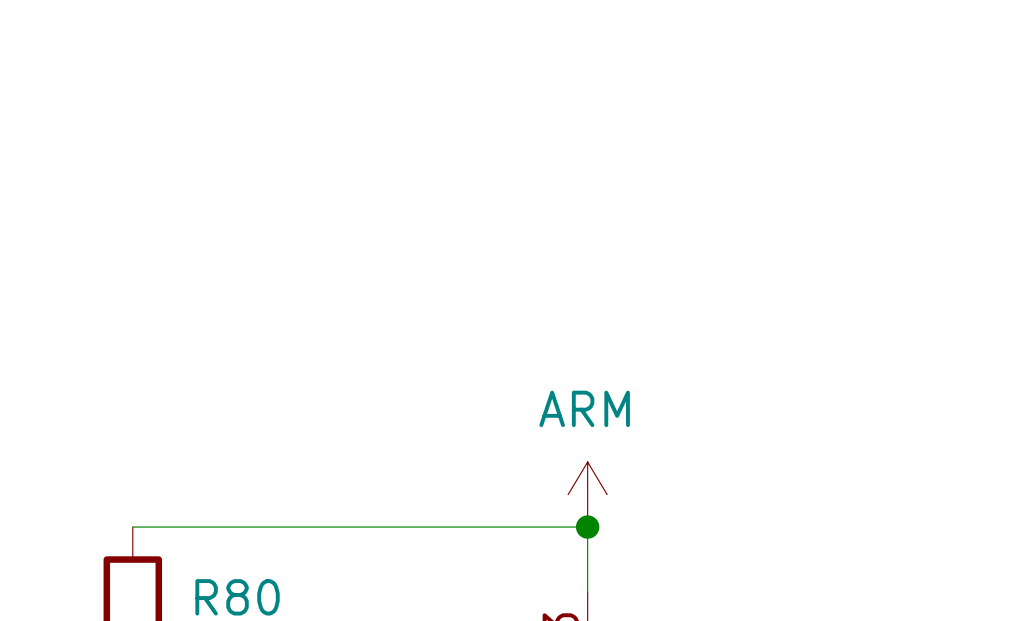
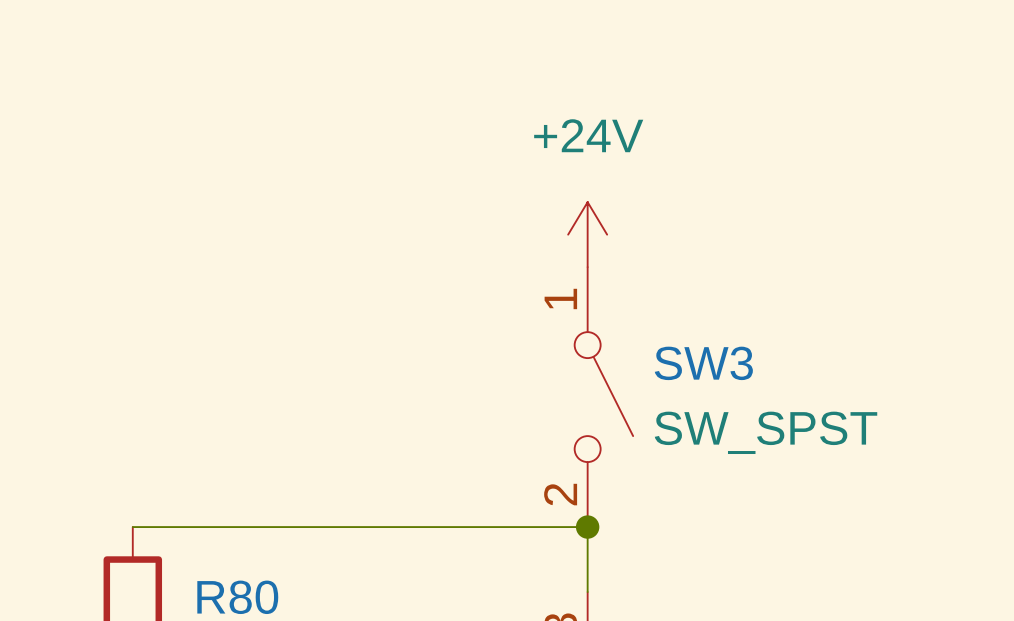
power symbol: none -> +24V (587, 234)
SW3: none -> SW_SPST (603, 397)
power symbol: ARM (587, 494) -> none

